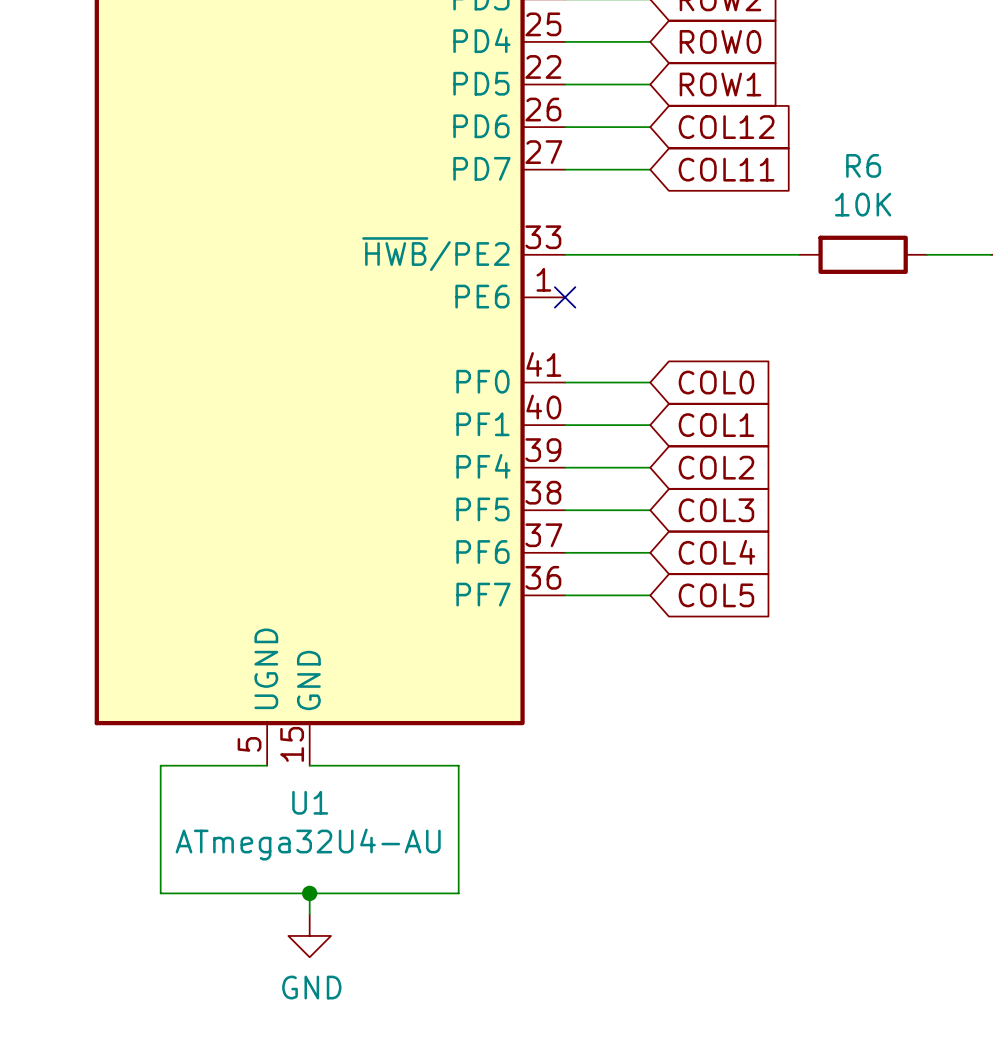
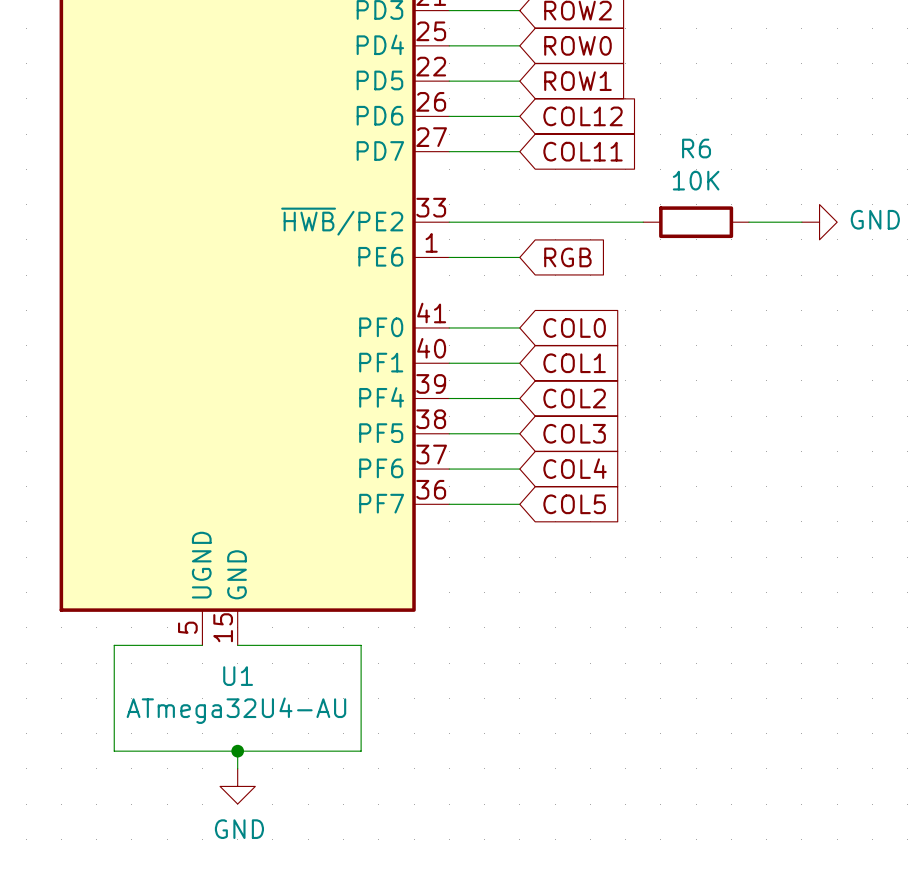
wire: none -> (449, 257) (519, 257)
no-connect mark: (565, 297) -> none
global label: none -> RGB (567, 257)

